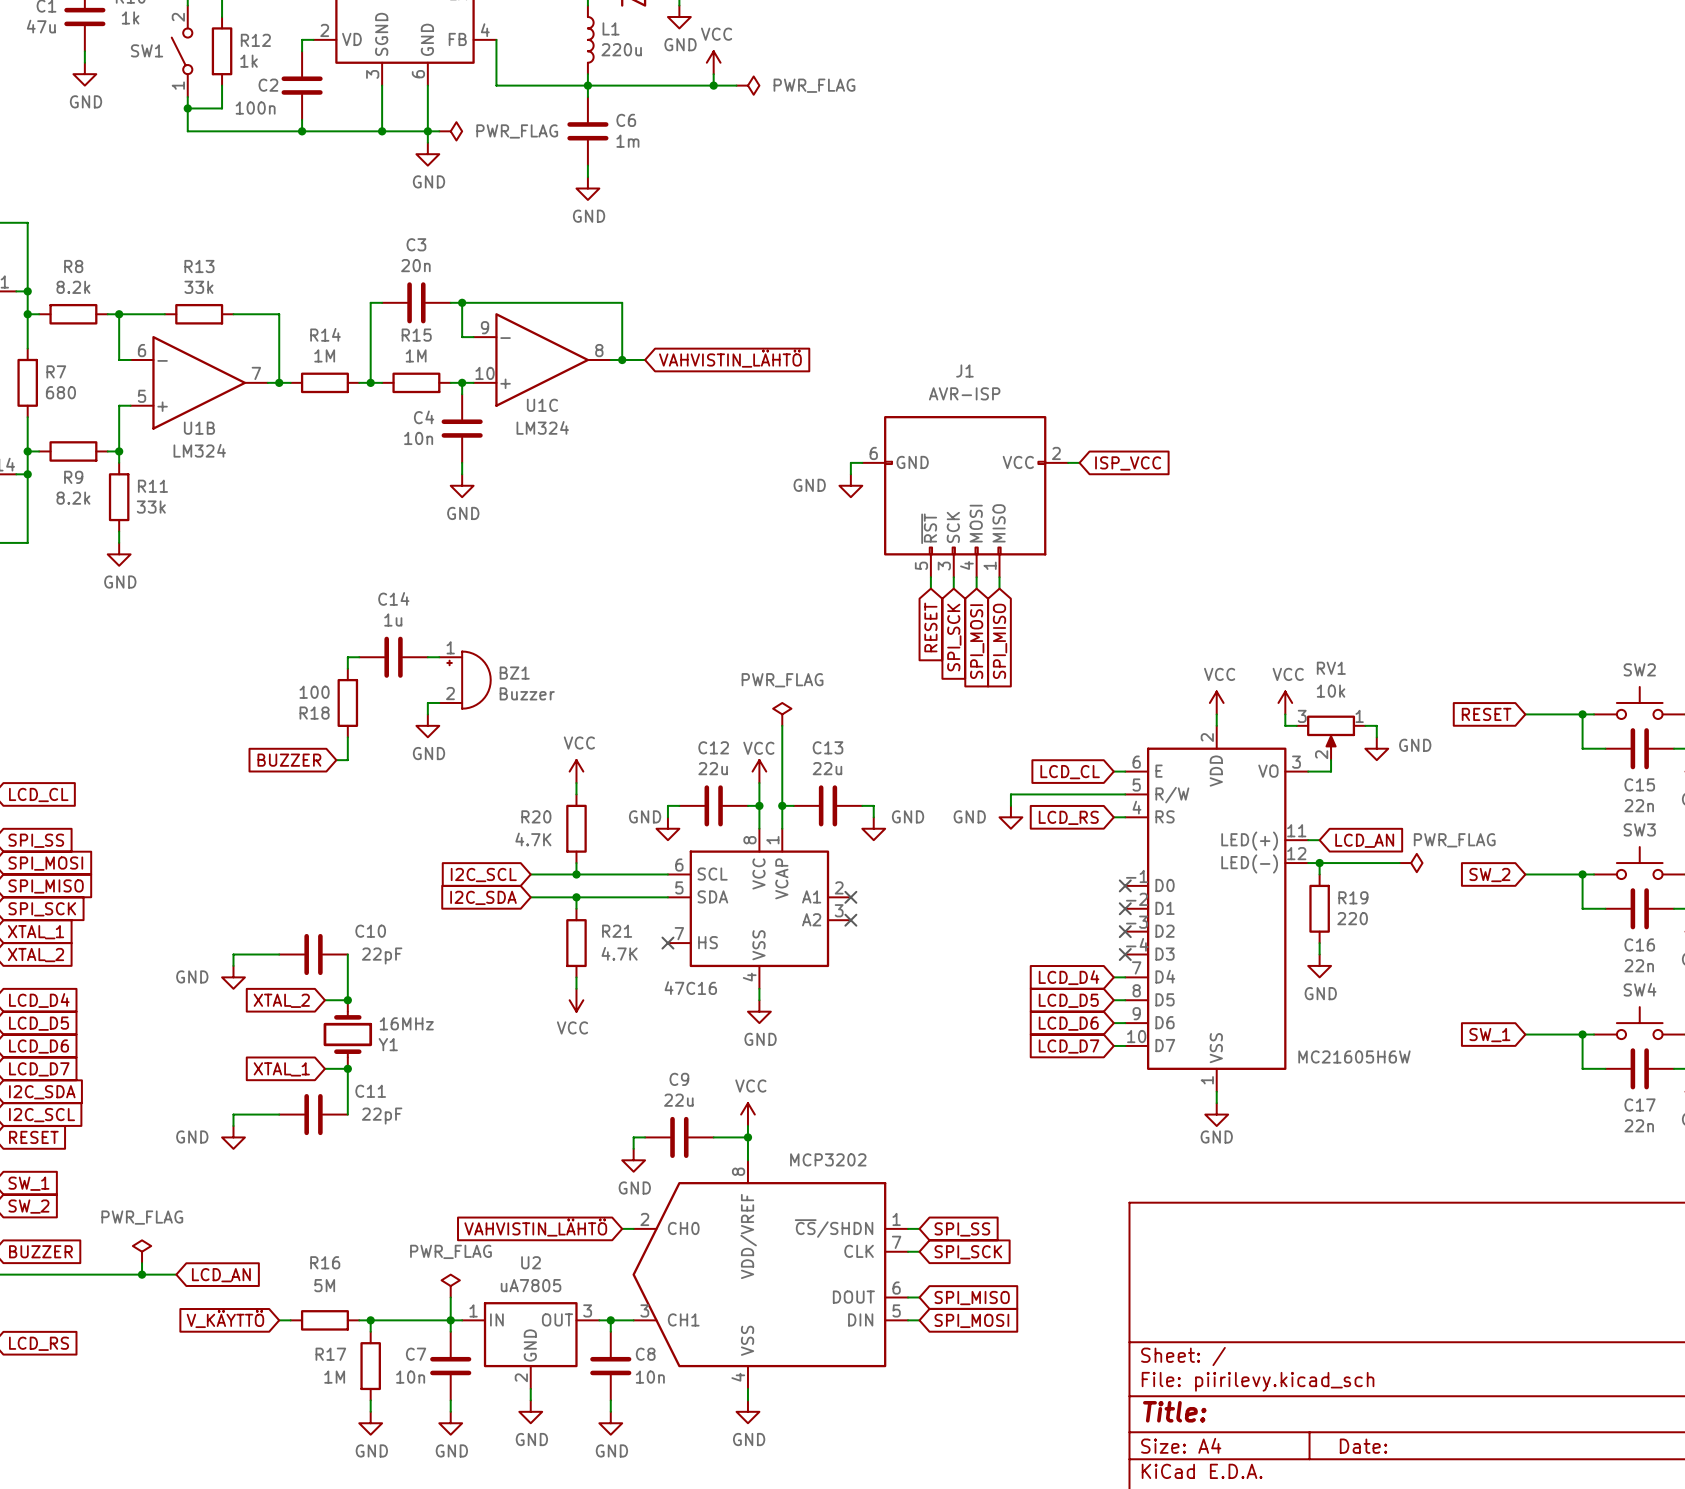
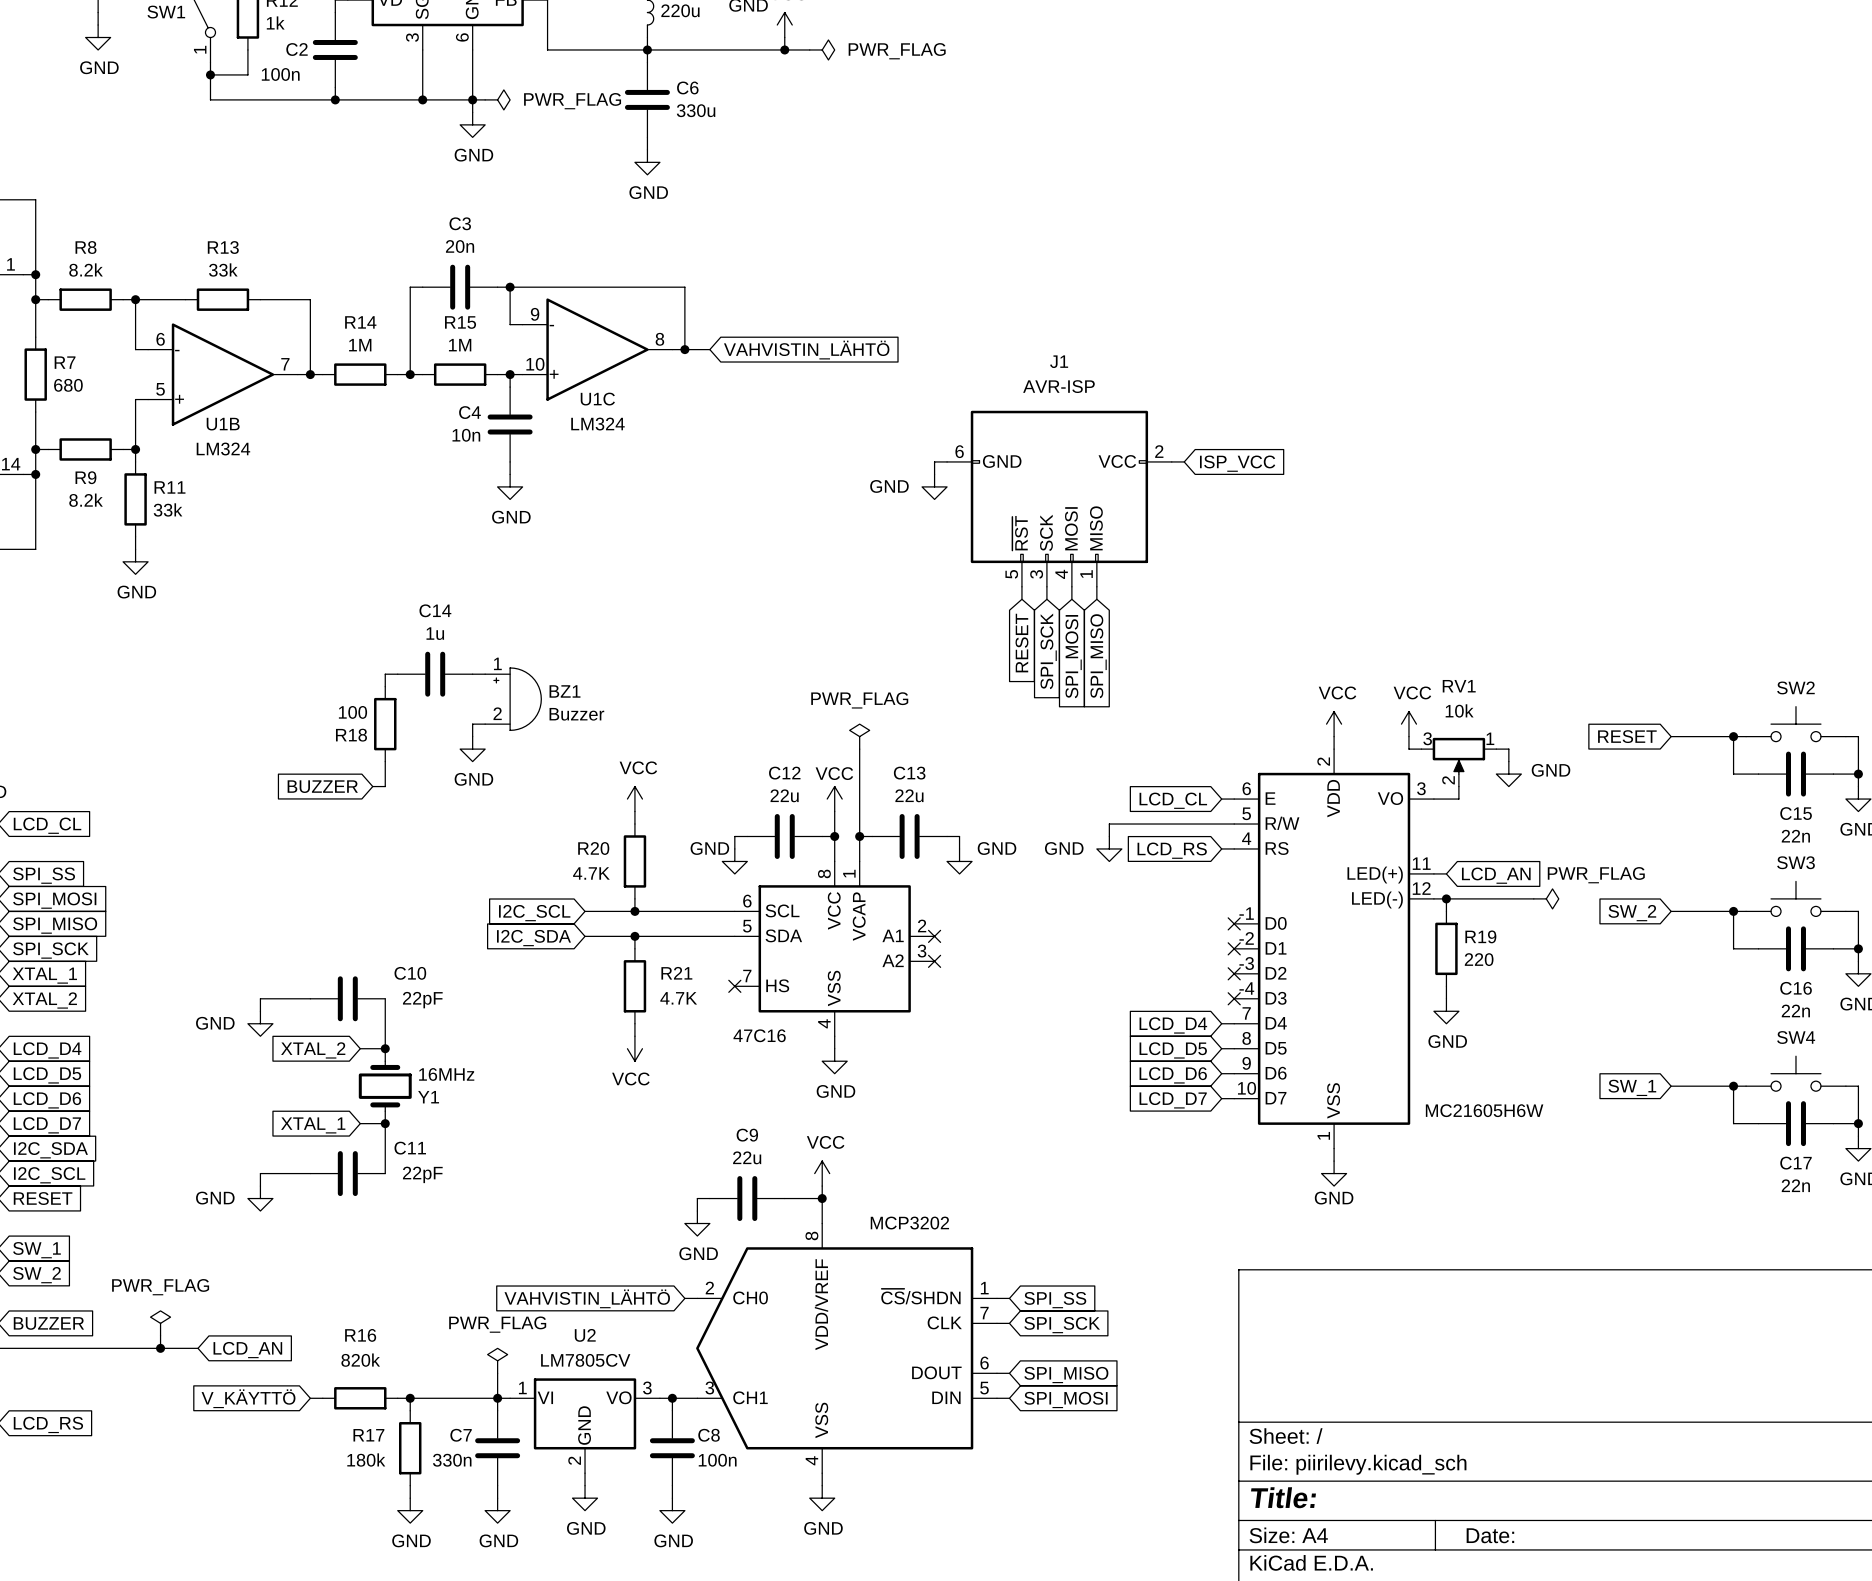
C6 value: 1m (627, 141) -> 330u (696, 110)
R16 value: 5M (324, 1285) -> 820k (360, 1360)
U2 value: uA7805 (531, 1285) -> LM7805CV (585, 1360)
U2 pin name: IN (496, 1319) -> VI (545, 1397)
U2 pin name: OUT (557, 1319) -> VO (618, 1397)
R17 value: 1M (334, 1377) -> 180k (366, 1459)
C7 value: 10n (410, 1377) -> 330n (452, 1460)
C8 value: 10n (650, 1377) -> 100n (717, 1460)

